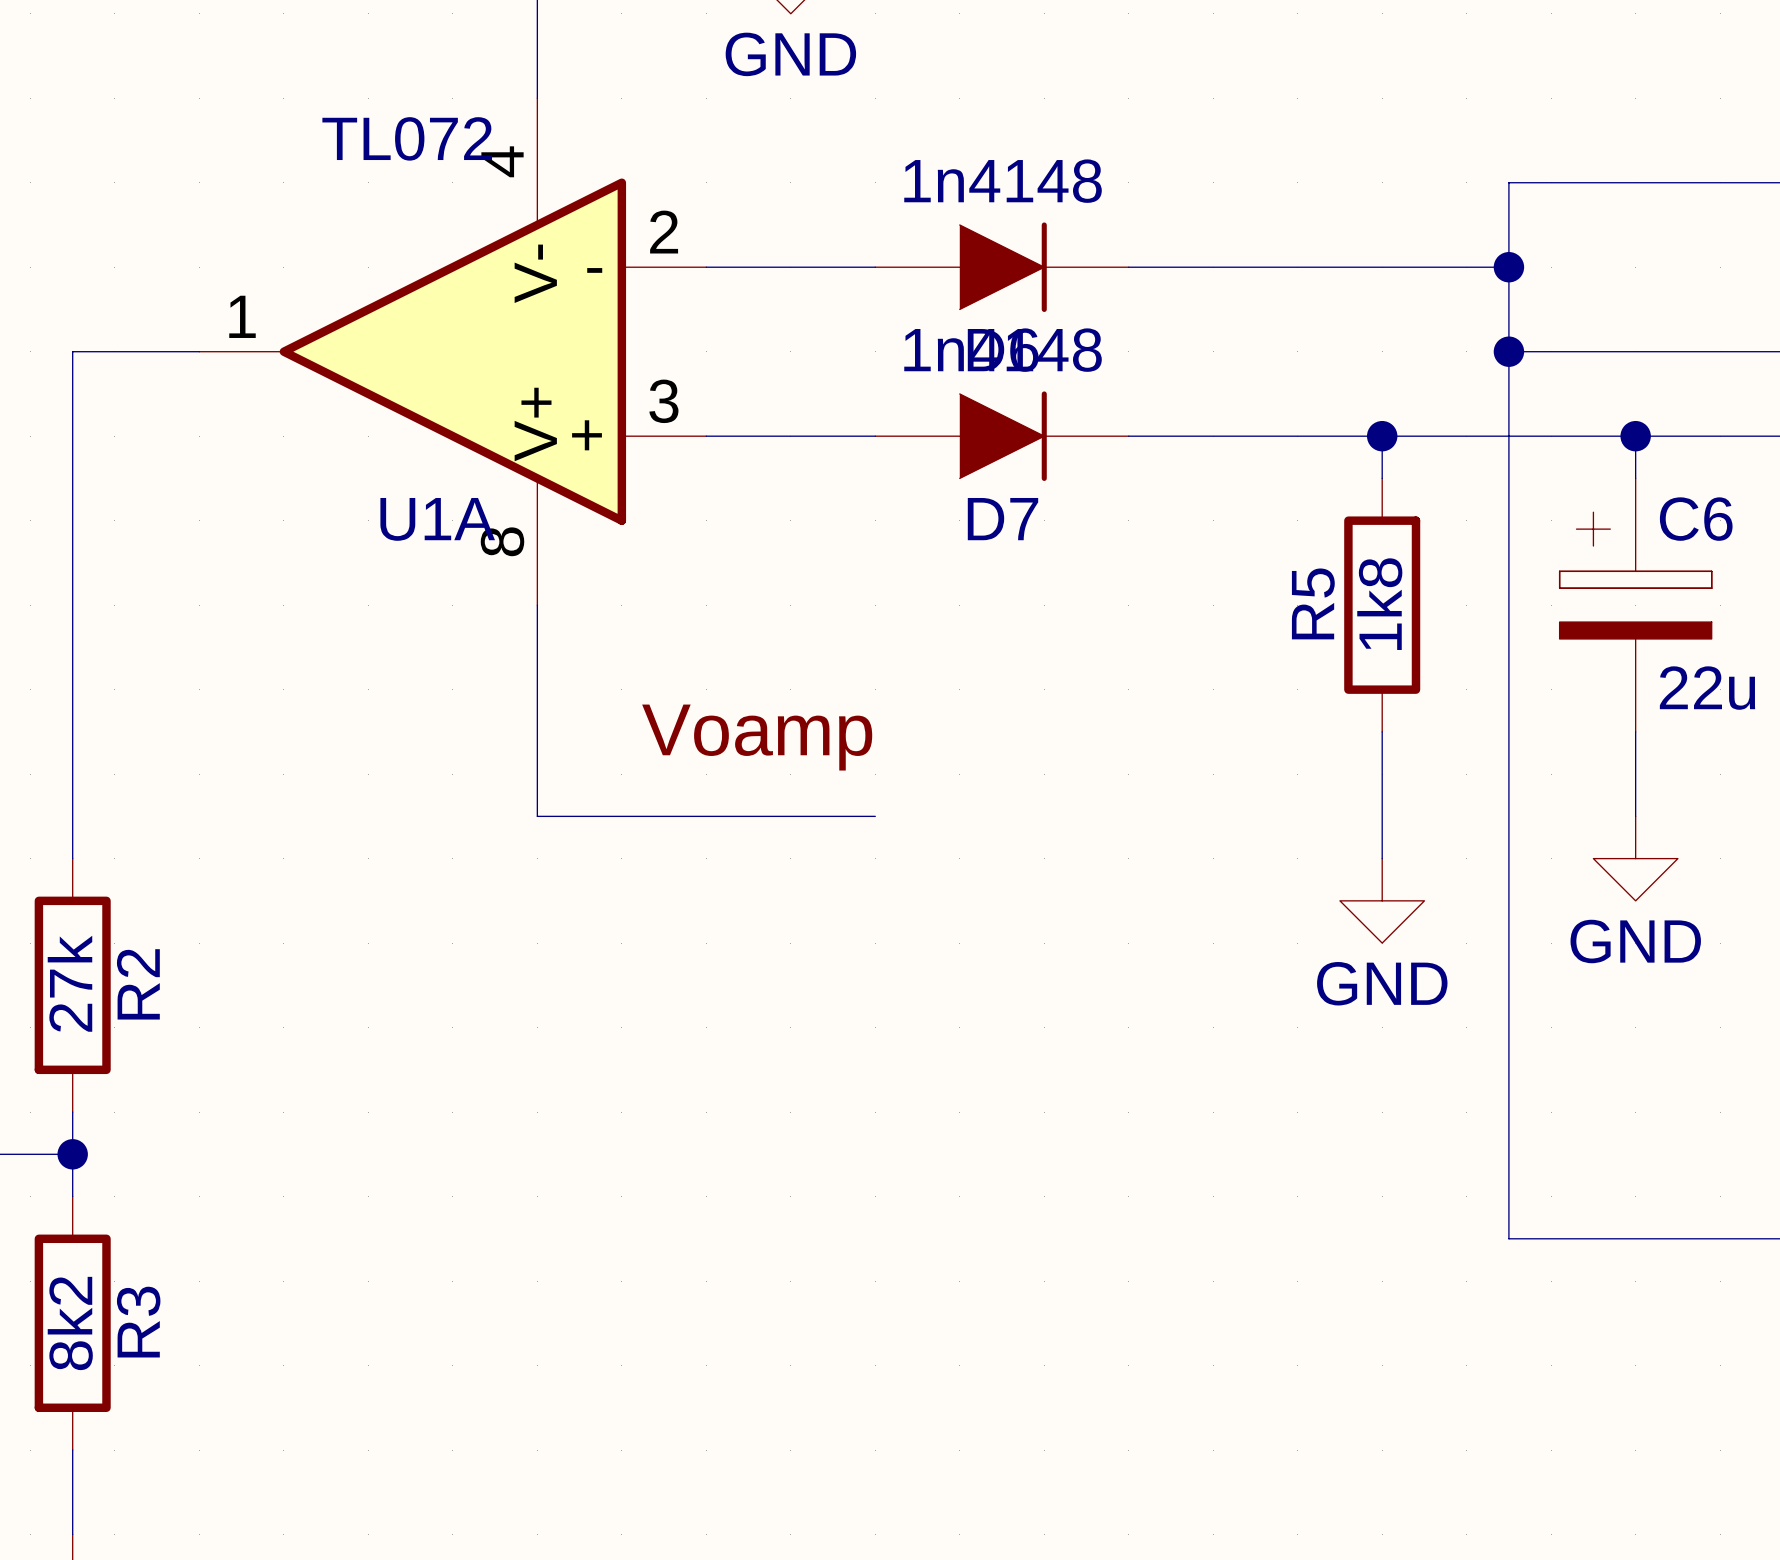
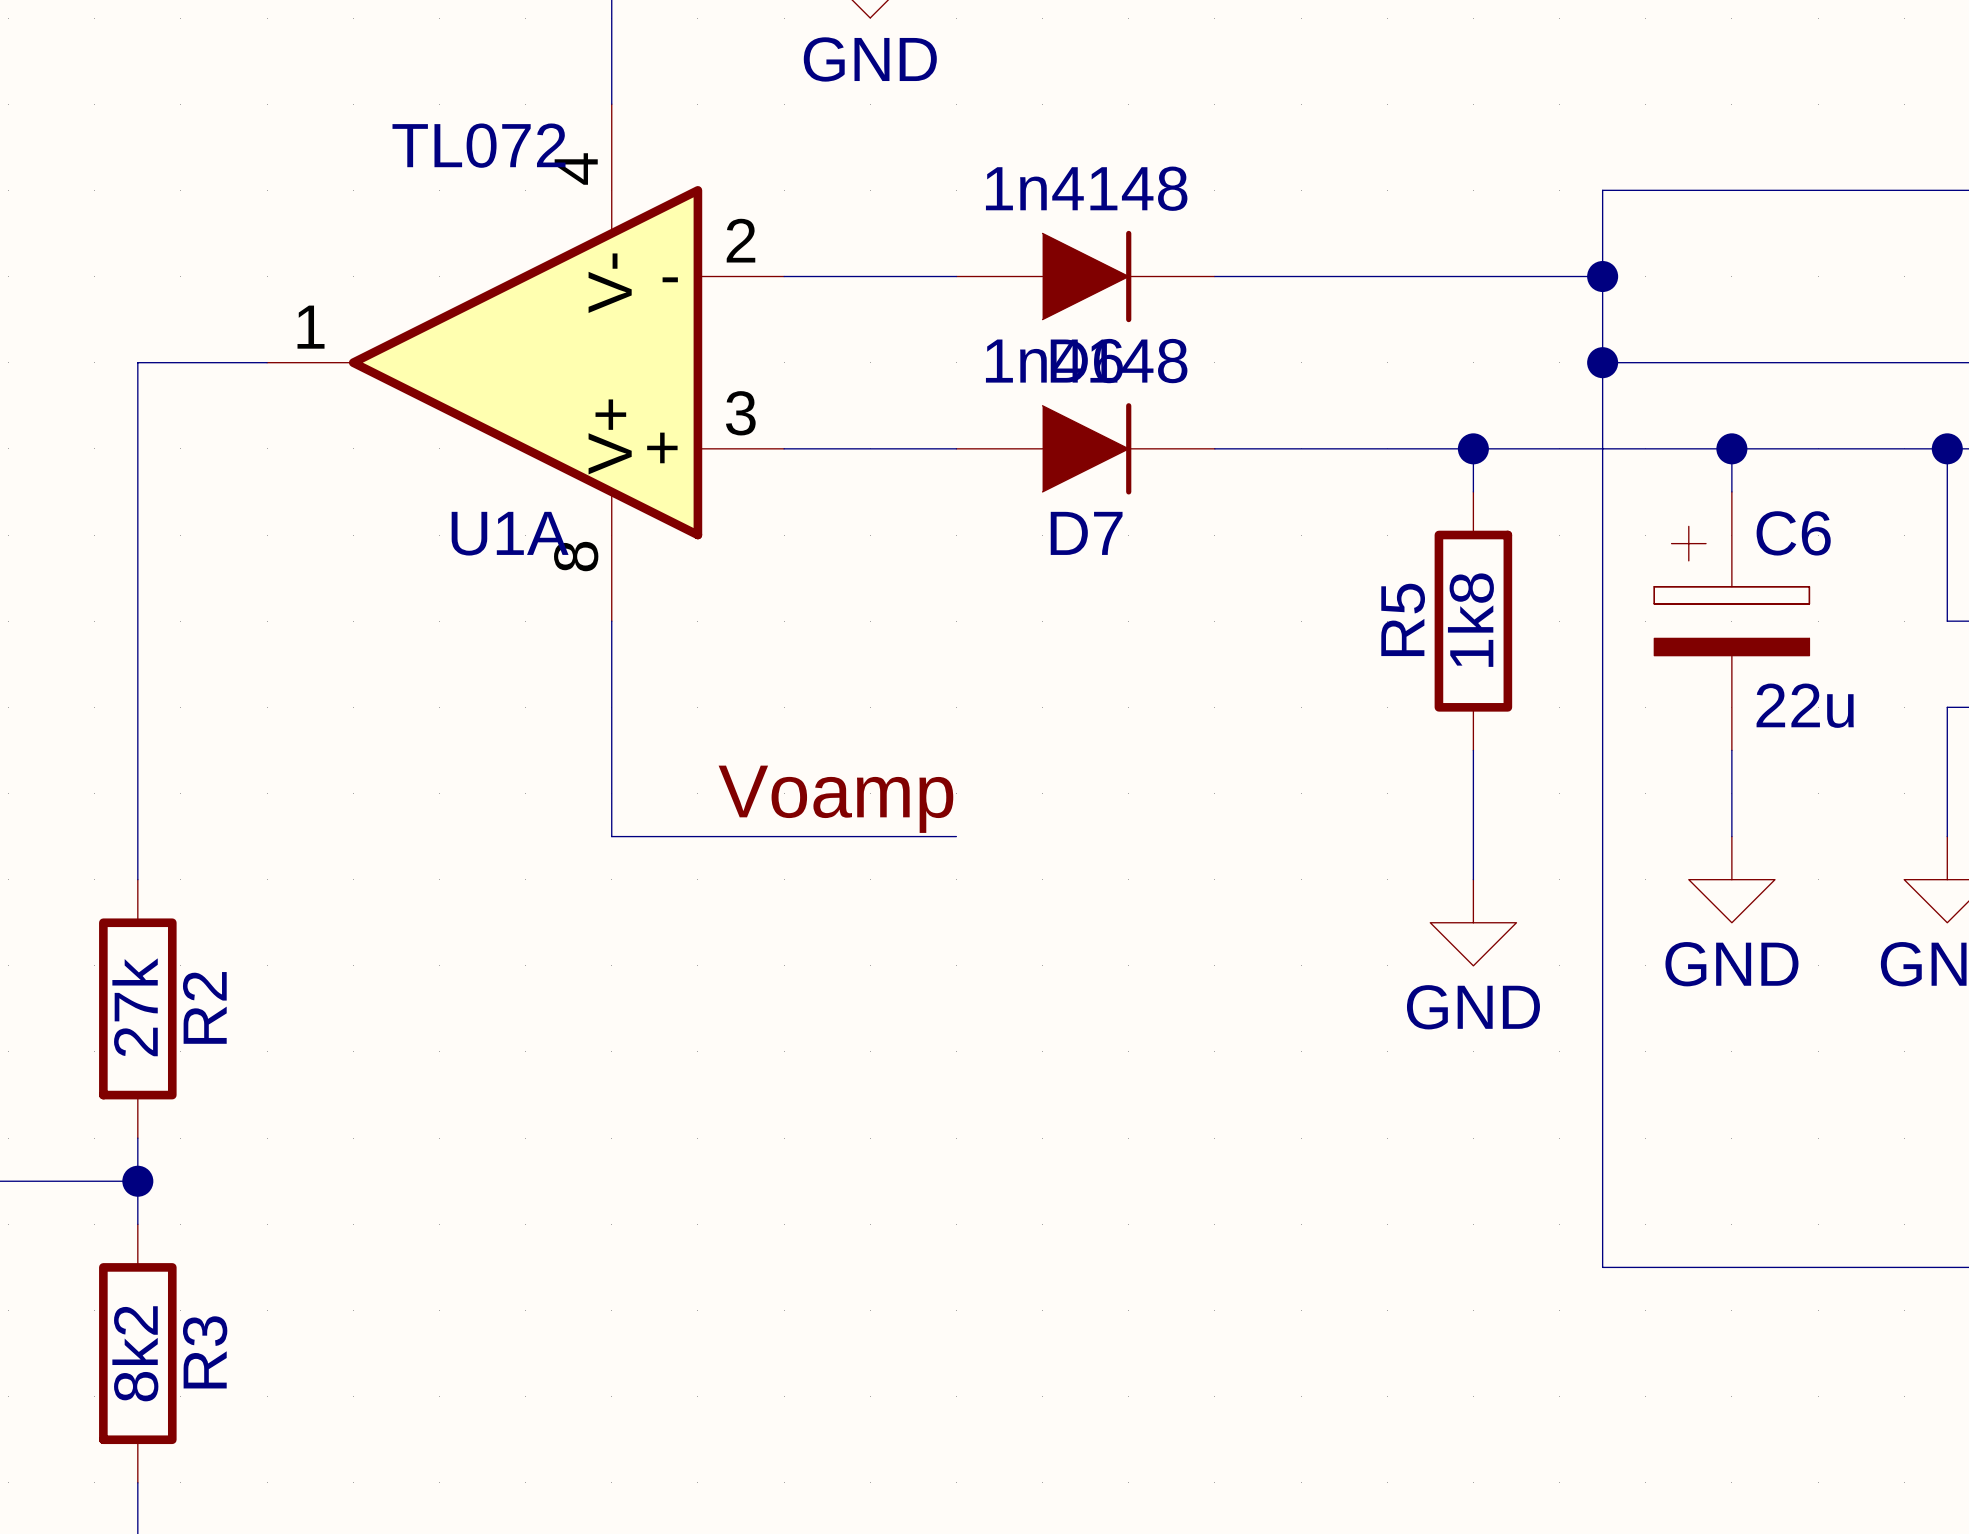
label position: Voamp (757, 737) -> Voamp (835, 799)

